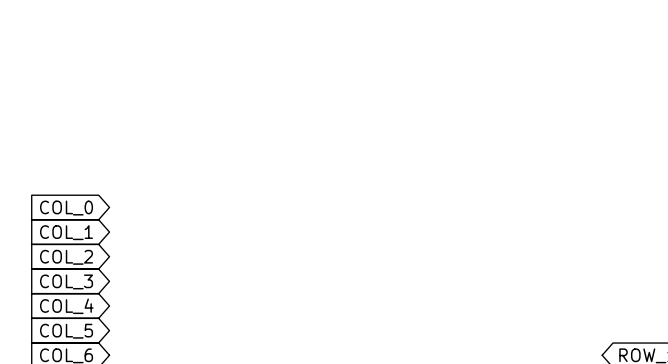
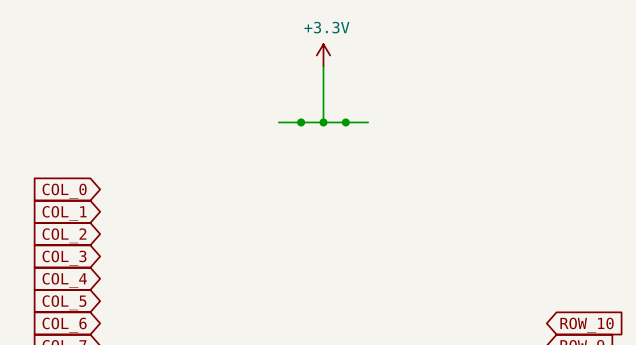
power symbol: none -> +3.3V (323, 55)
wire: none -> (323, 66) (323, 122)
wire: none -> (278, 122) (368, 122)
junction: none -> (301, 122)
junction: none -> (323, 122)
junction: none -> (345, 122)

